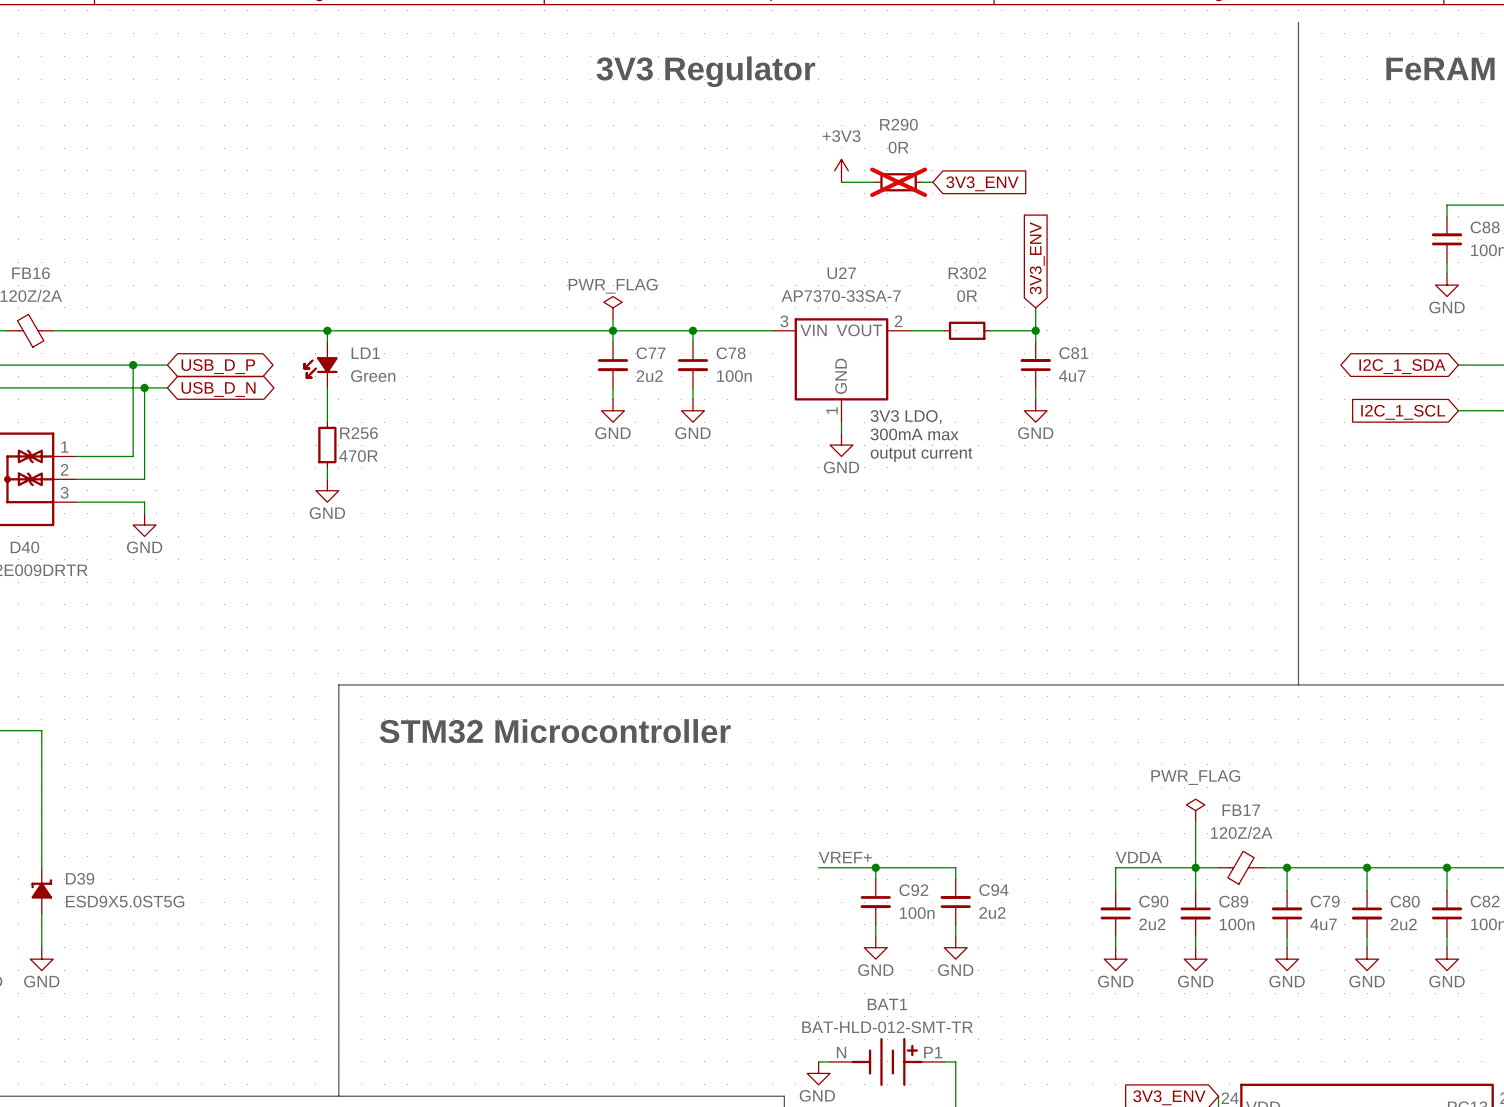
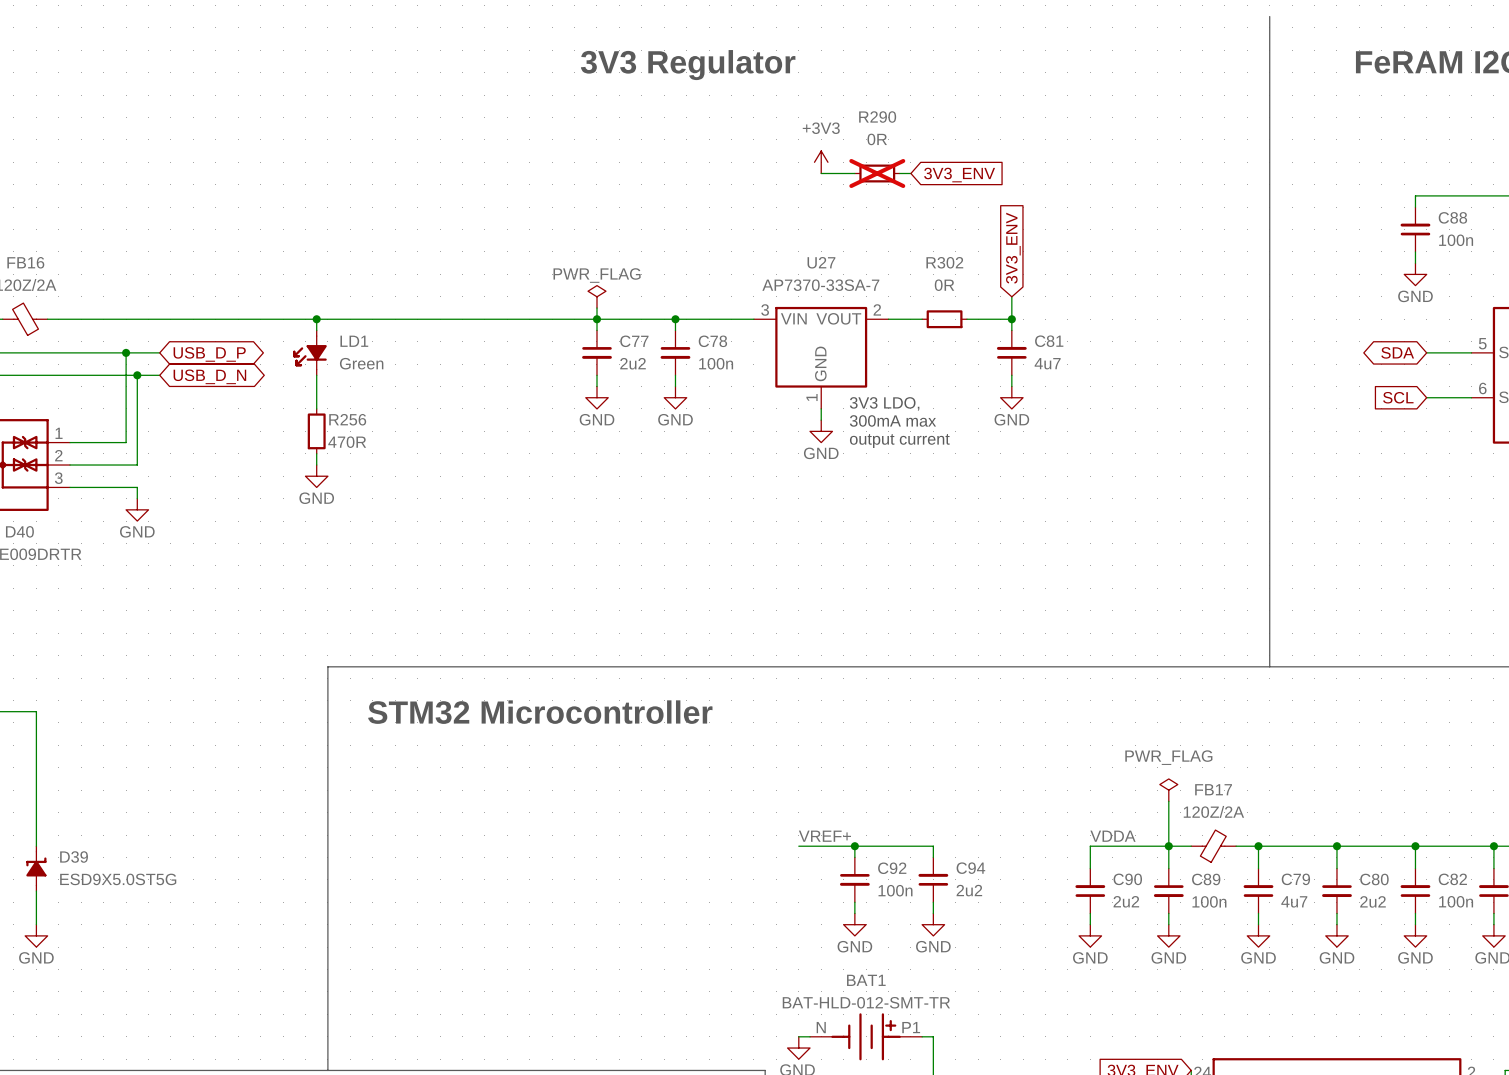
global label: I2C_1_SDA (1402, 366) -> SDA (1397, 352)
global label: I2C_1_SCL (1403, 412) -> SCL (1398, 397)

